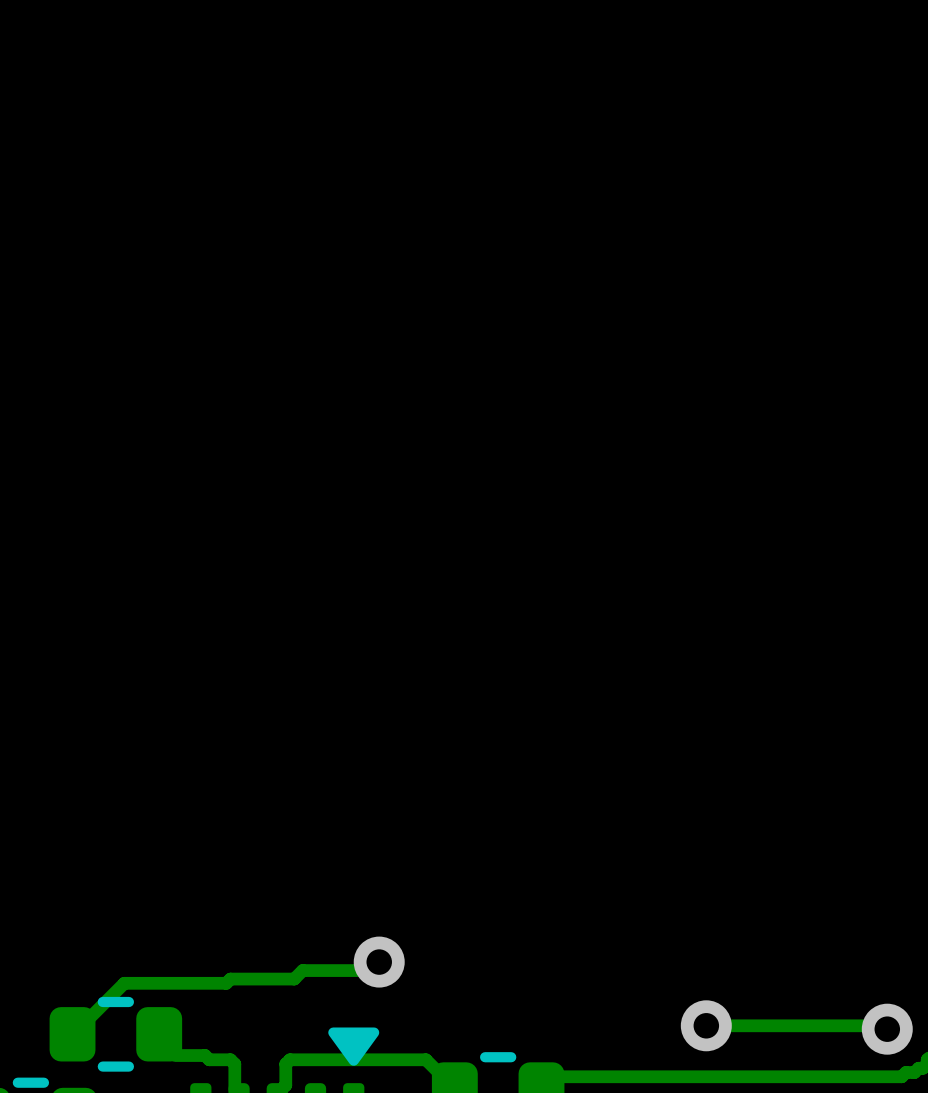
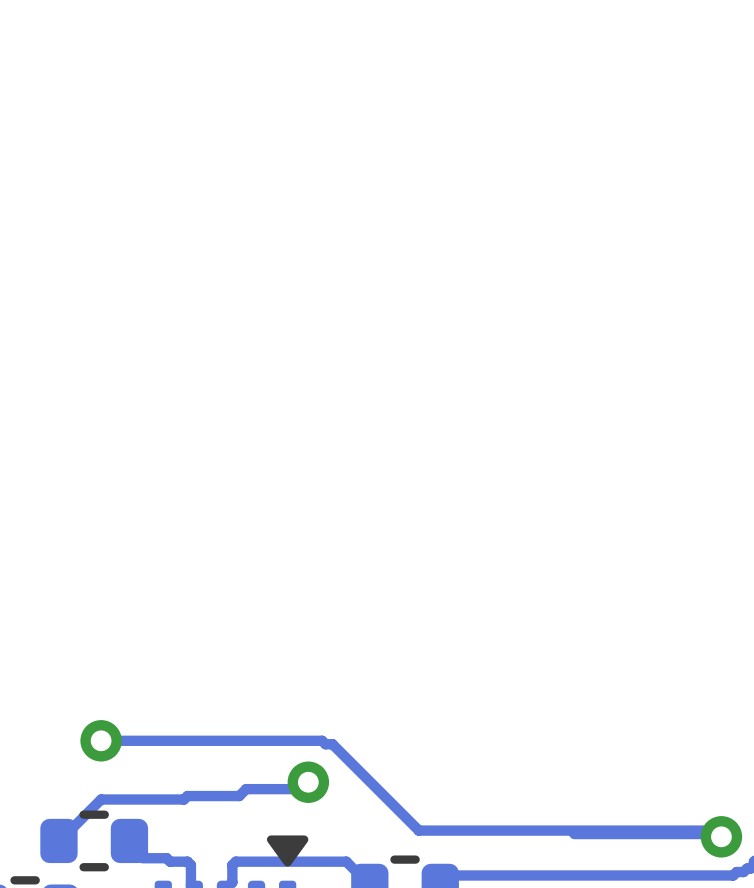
track: none -> (101, 740) (322, 740) (325, 744) (332, 744) (418, 830) (705, 830)
via: none -> (101, 740)
via: (706, 1025) -> none

